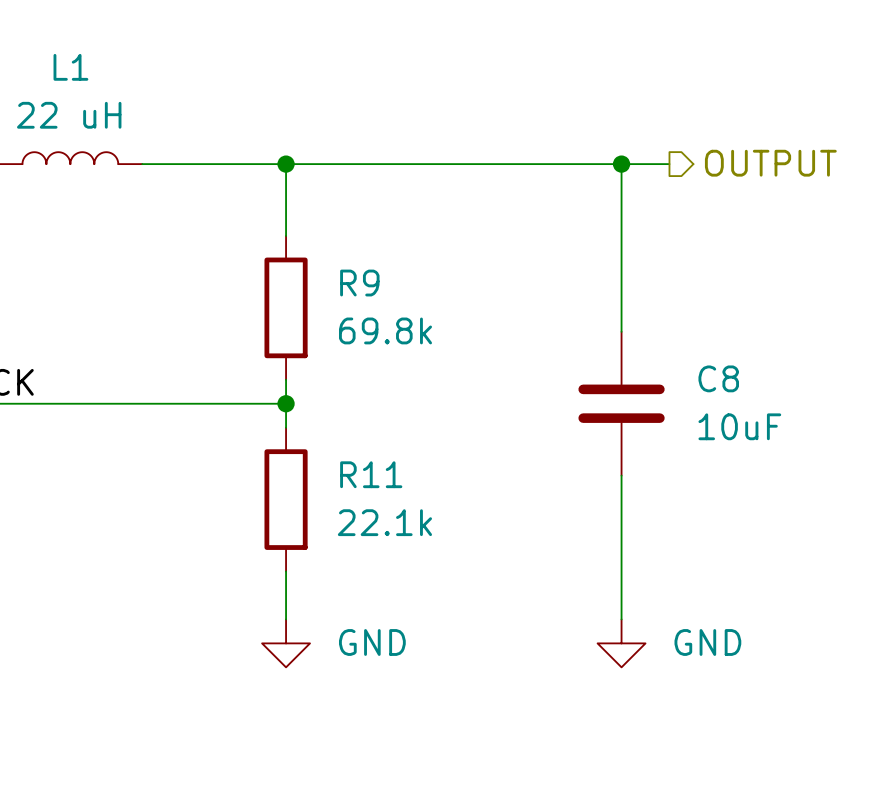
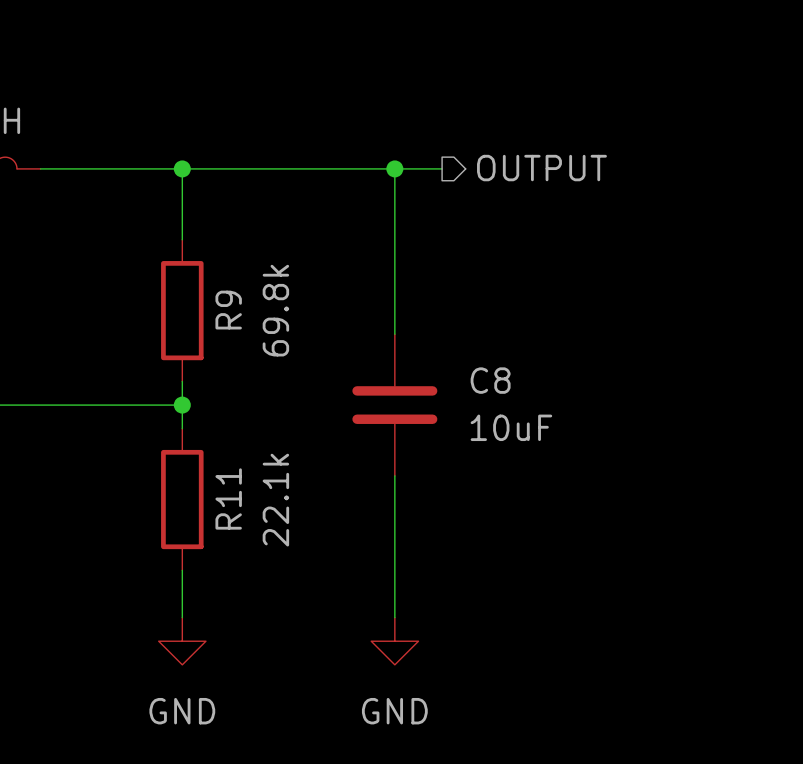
hierarchical label position: OUTPUT (770, 163) -> OUTPUT (541, 168)
junction: none -> (394, 168)
wire: (549, 164) (669, 164) -> none
wire: (621, 164) (621, 331) -> (394, 168) (394, 334)
junction: (621, 164) -> none
R9 name rotation: 0° (359, 283) -> 90° counterclockwise (228, 310)
R9 value rotation: 0° (385, 330) -> 90° counterclockwise (275, 310)
C8 position: (621, 403) -> (394, 405)
R11 name rotation: 0° (371, 474) -> 90° counterclockwise (228, 498)
wire: (621, 475) (621, 619) -> (394, 475) (394, 617)
R11 value rotation: 0° (384, 522) -> 90° counterclockwise (275, 500)
power symbol text position: GND (372, 642) -> GND (182, 711)
power symbol text position: GND (707, 642) -> GND (394, 711)
power symbol position: GND (621, 643) -> GND (394, 641)

